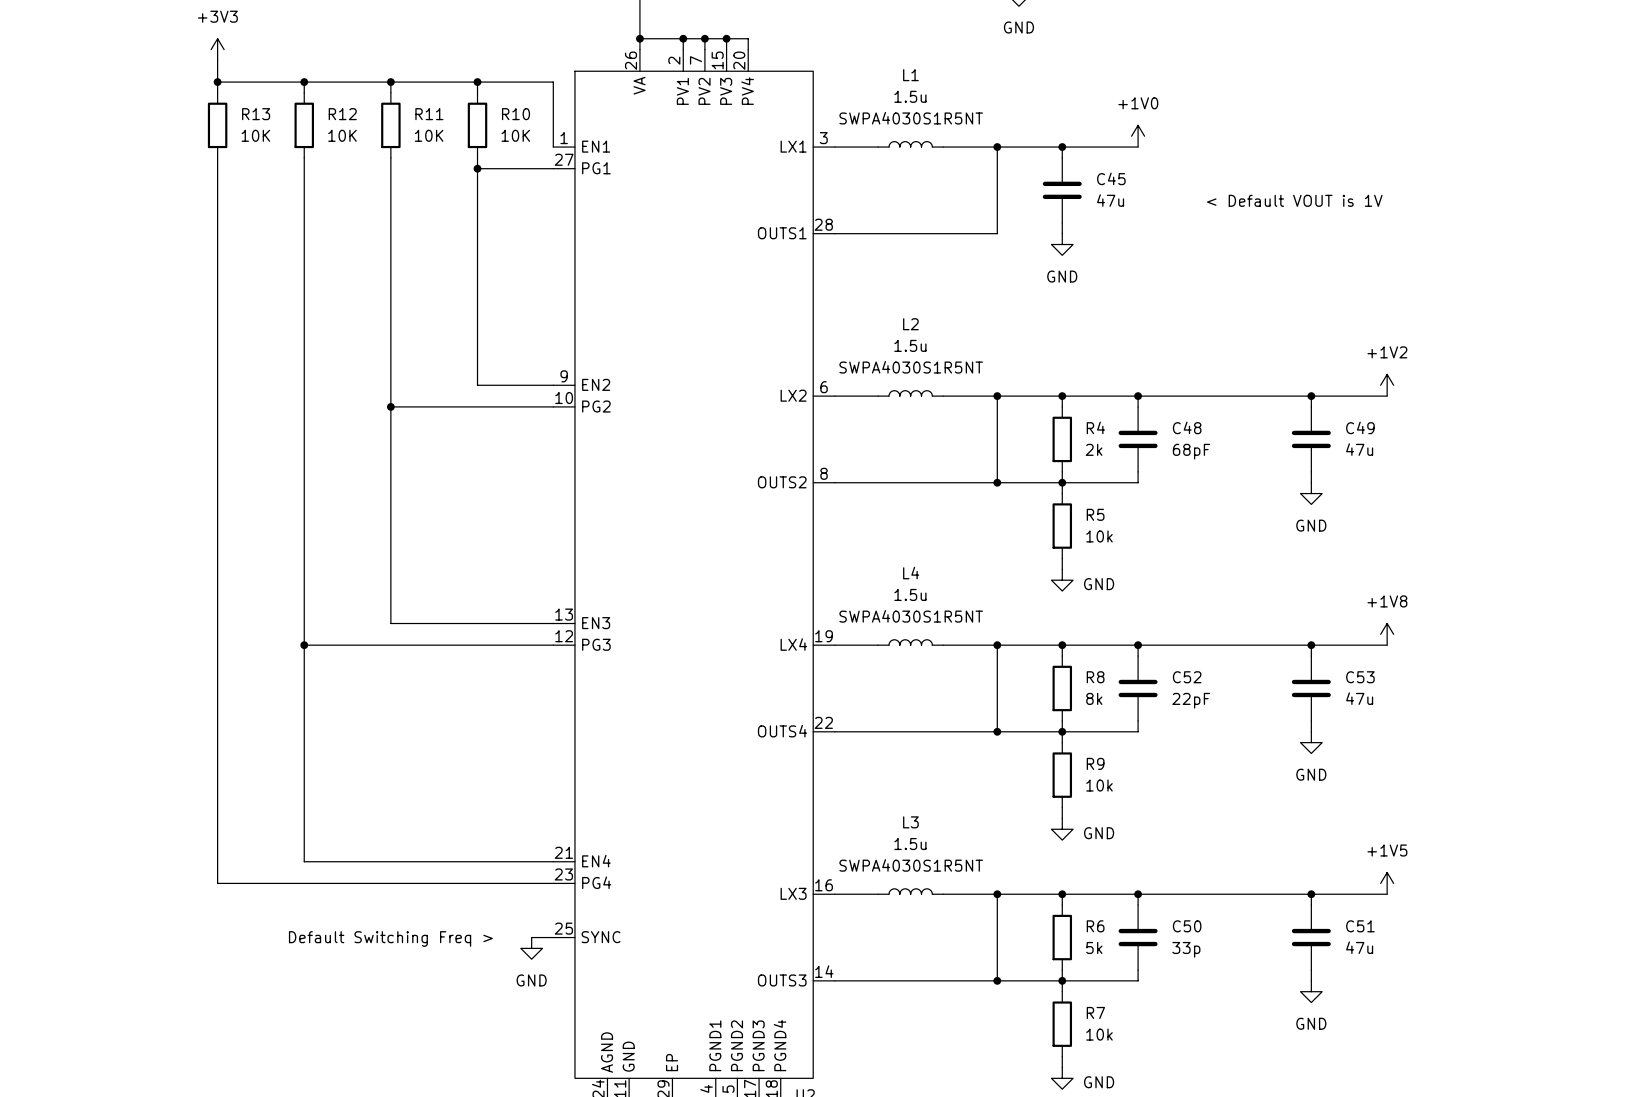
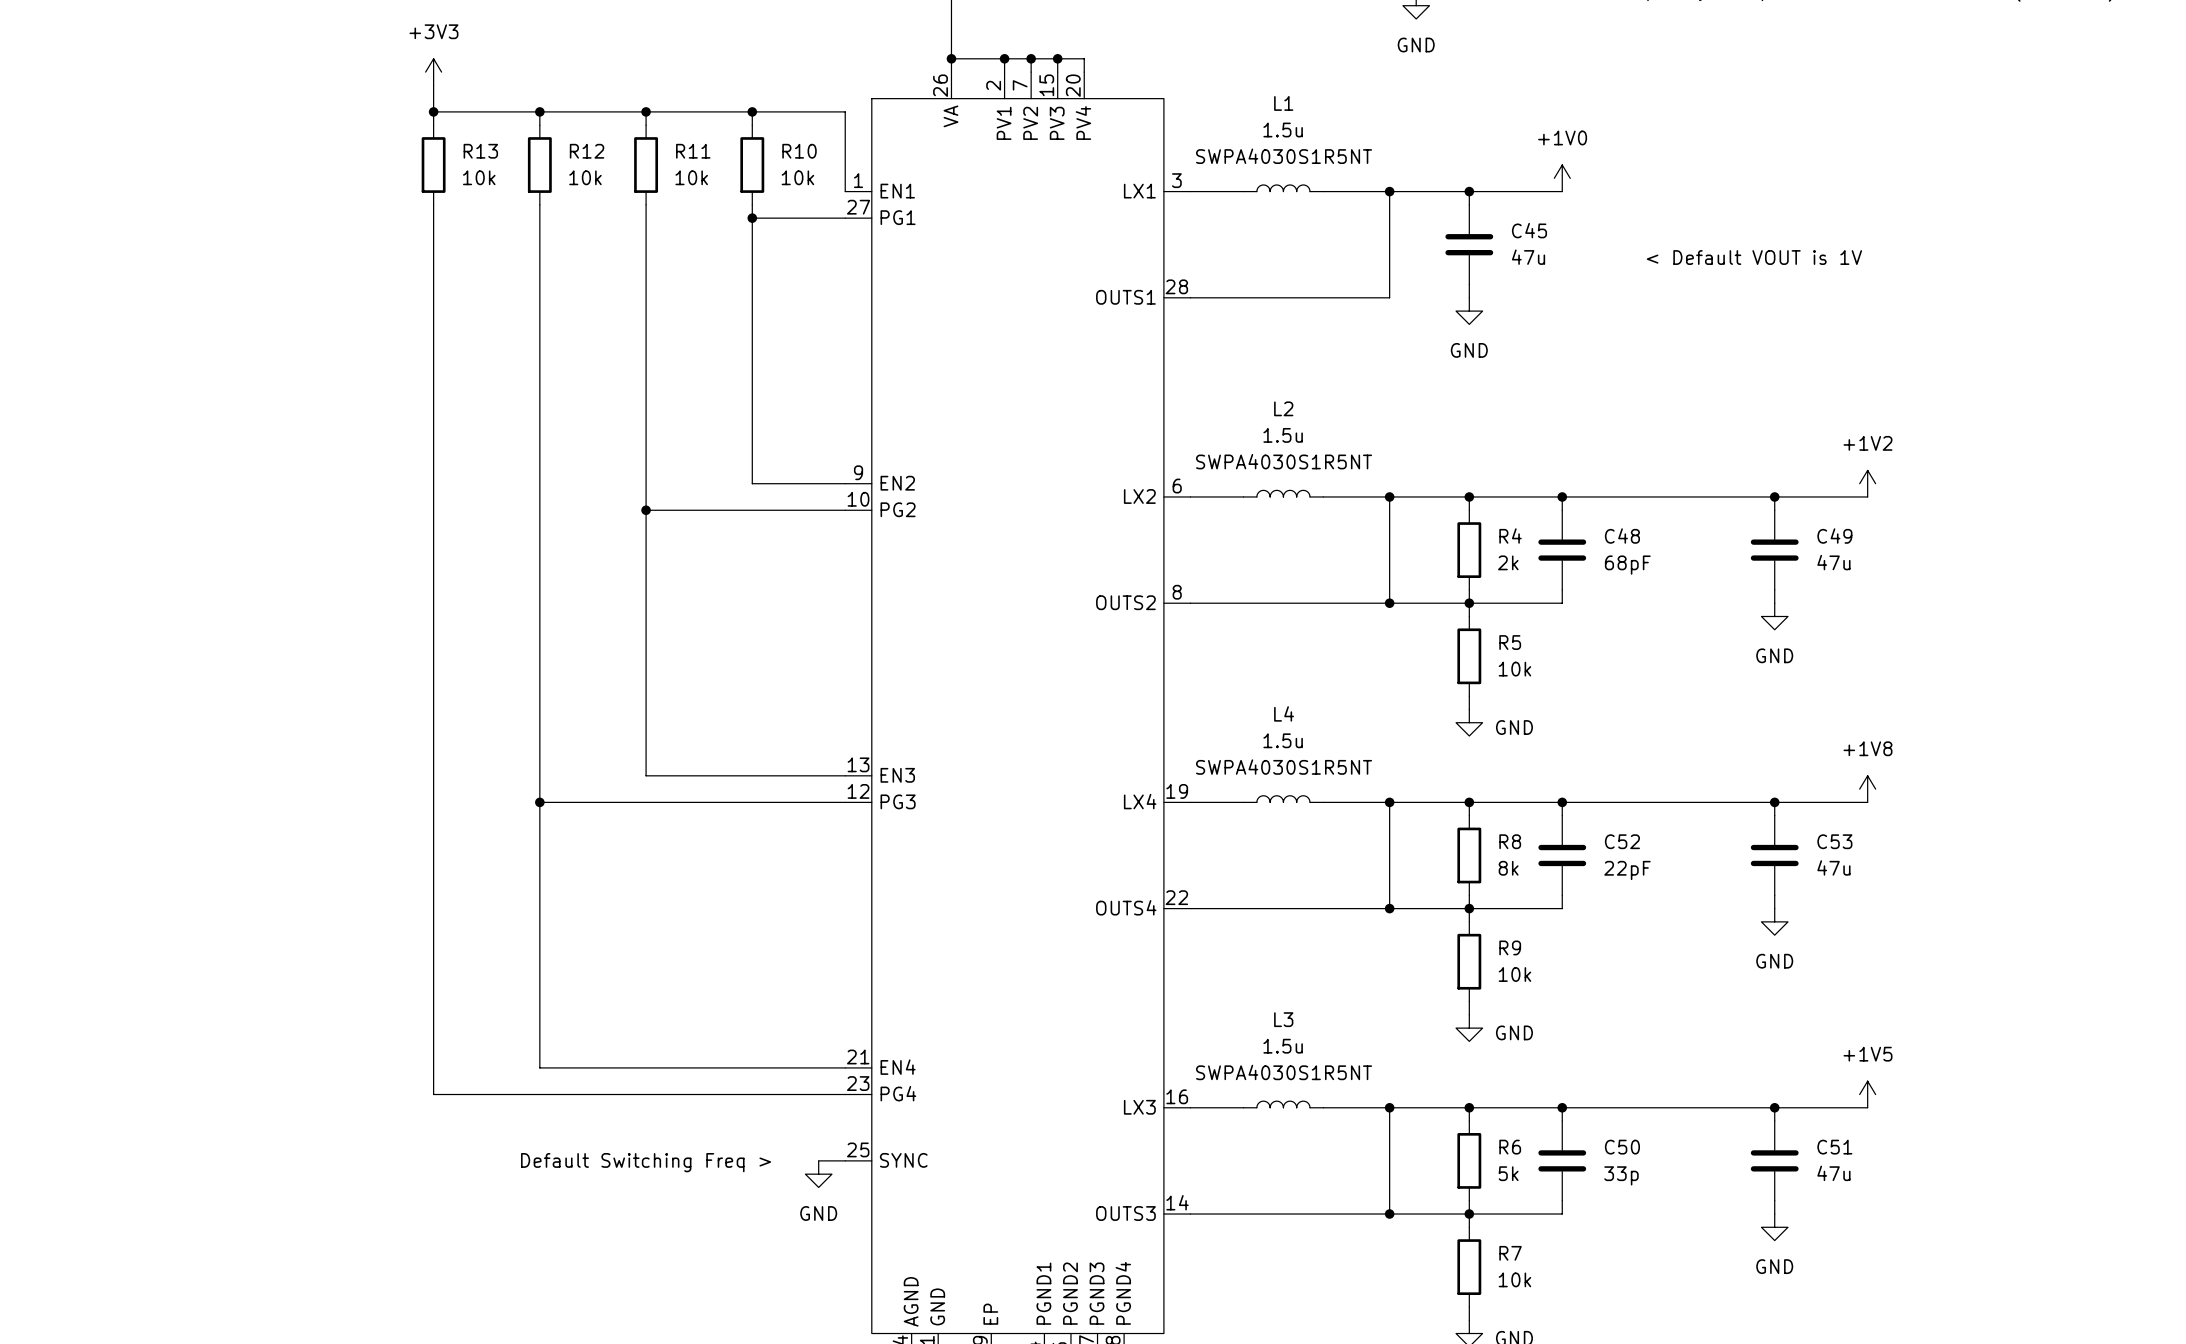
R13 value: 10K (255, 135) -> 10k (479, 177)
R12 value: 10K (342, 135) -> 10k (585, 177)
R11 value: 10K (429, 135) -> 10k (691, 177)
R10 value: 10K (515, 135) -> 10k (797, 177)

